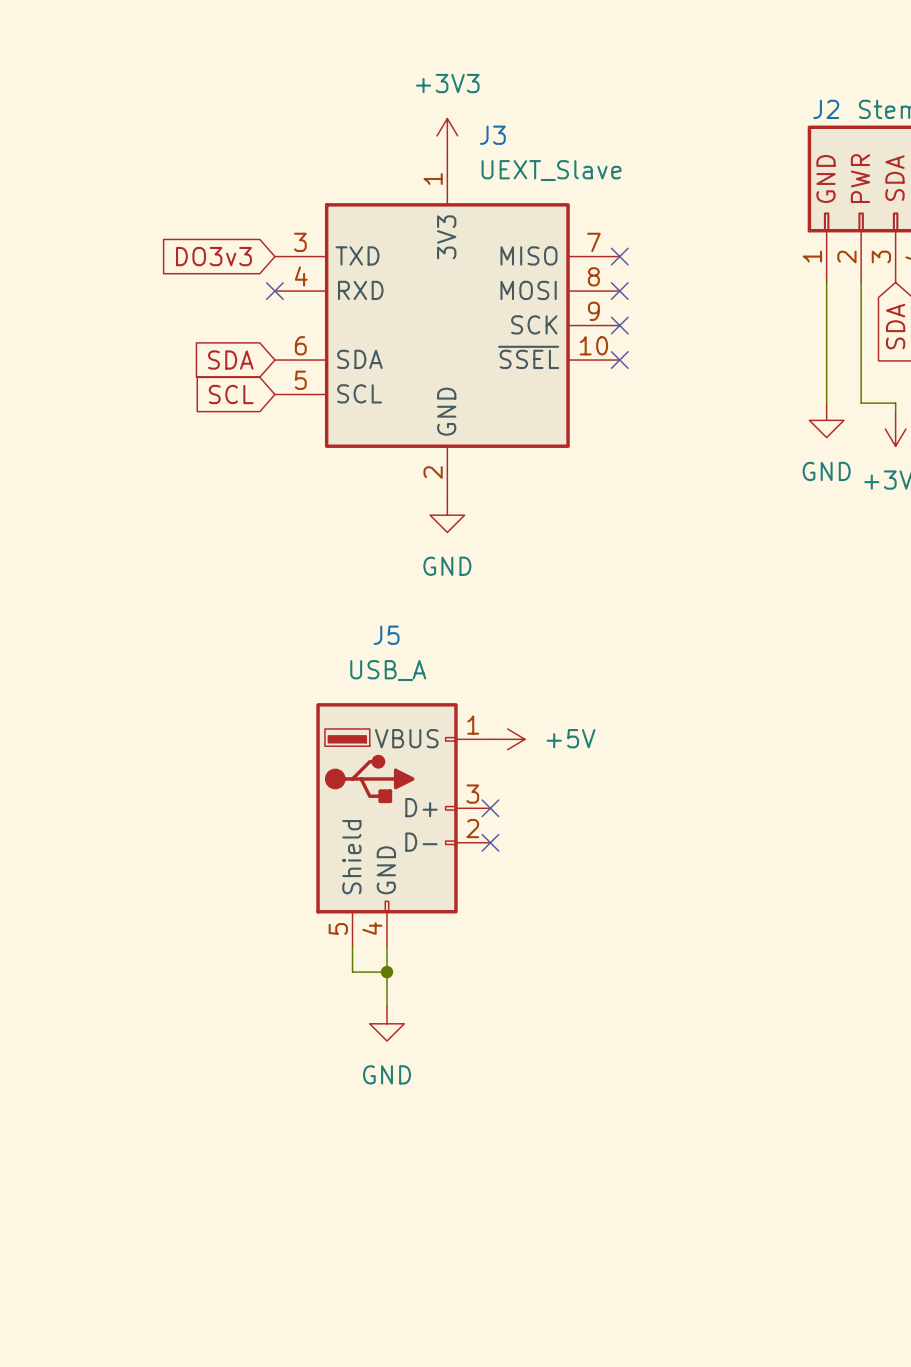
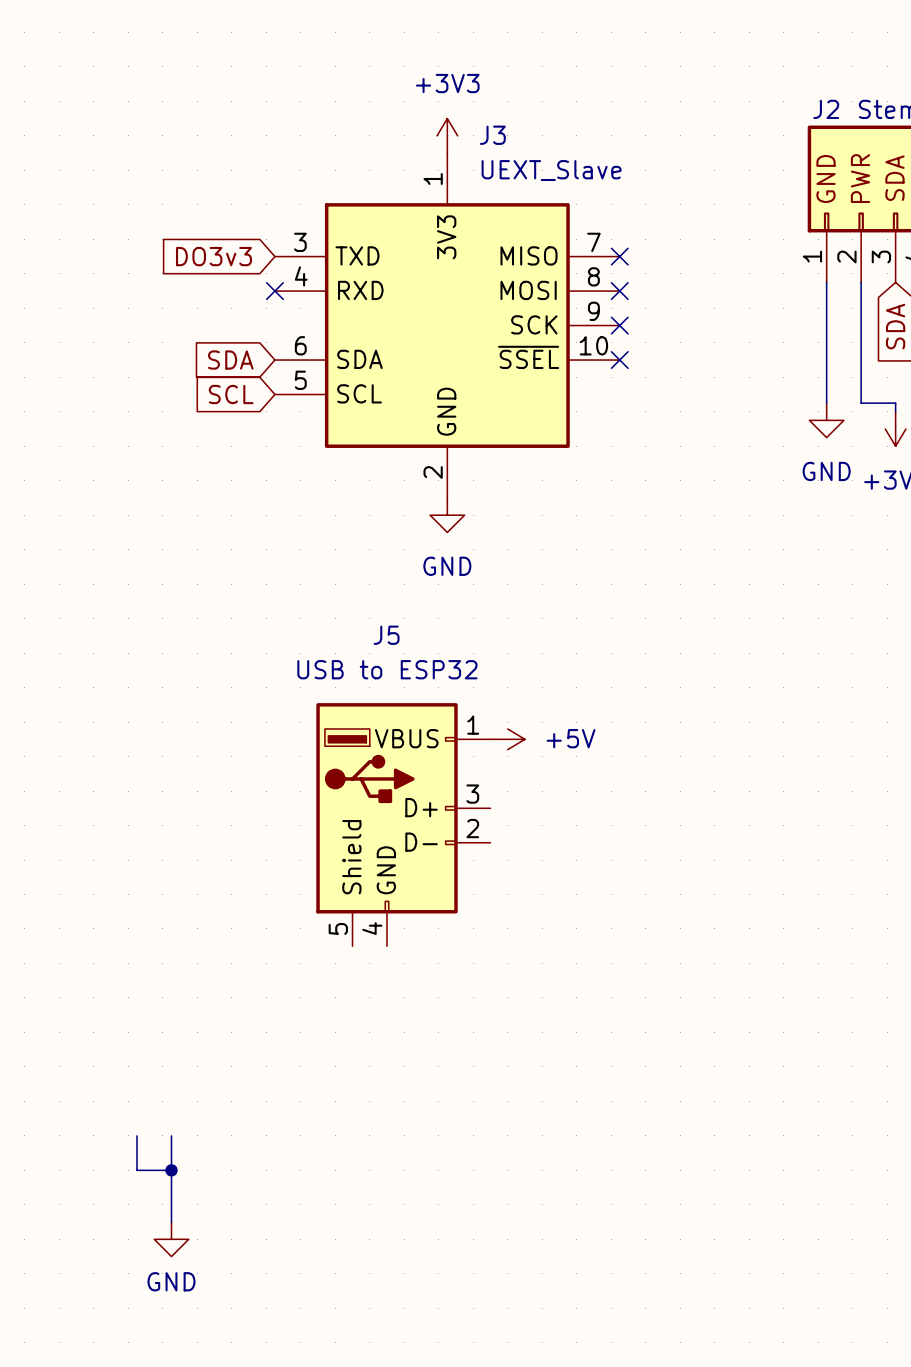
J5 value: USB_A (388, 670) -> USB to ESP32 (387, 669)
no-connect mark: (490, 808) -> none
no-connect mark: (490, 842) -> none
wire: (352, 946) (352, 972) (387, 972) -> none
wire: (387, 946) (387, 1006) -> none
junction: (387, 972) -> none
power symbol position: GND (387, 1023) -> GND (171, 1239)
power symbol text position: GND (387, 1074) -> GND (171, 1281)
wire: none -> (137, 1135) (137, 1170) (171, 1170)
wire: none -> (171, 1135) (171, 1222)
junction: none -> (171, 1170)

